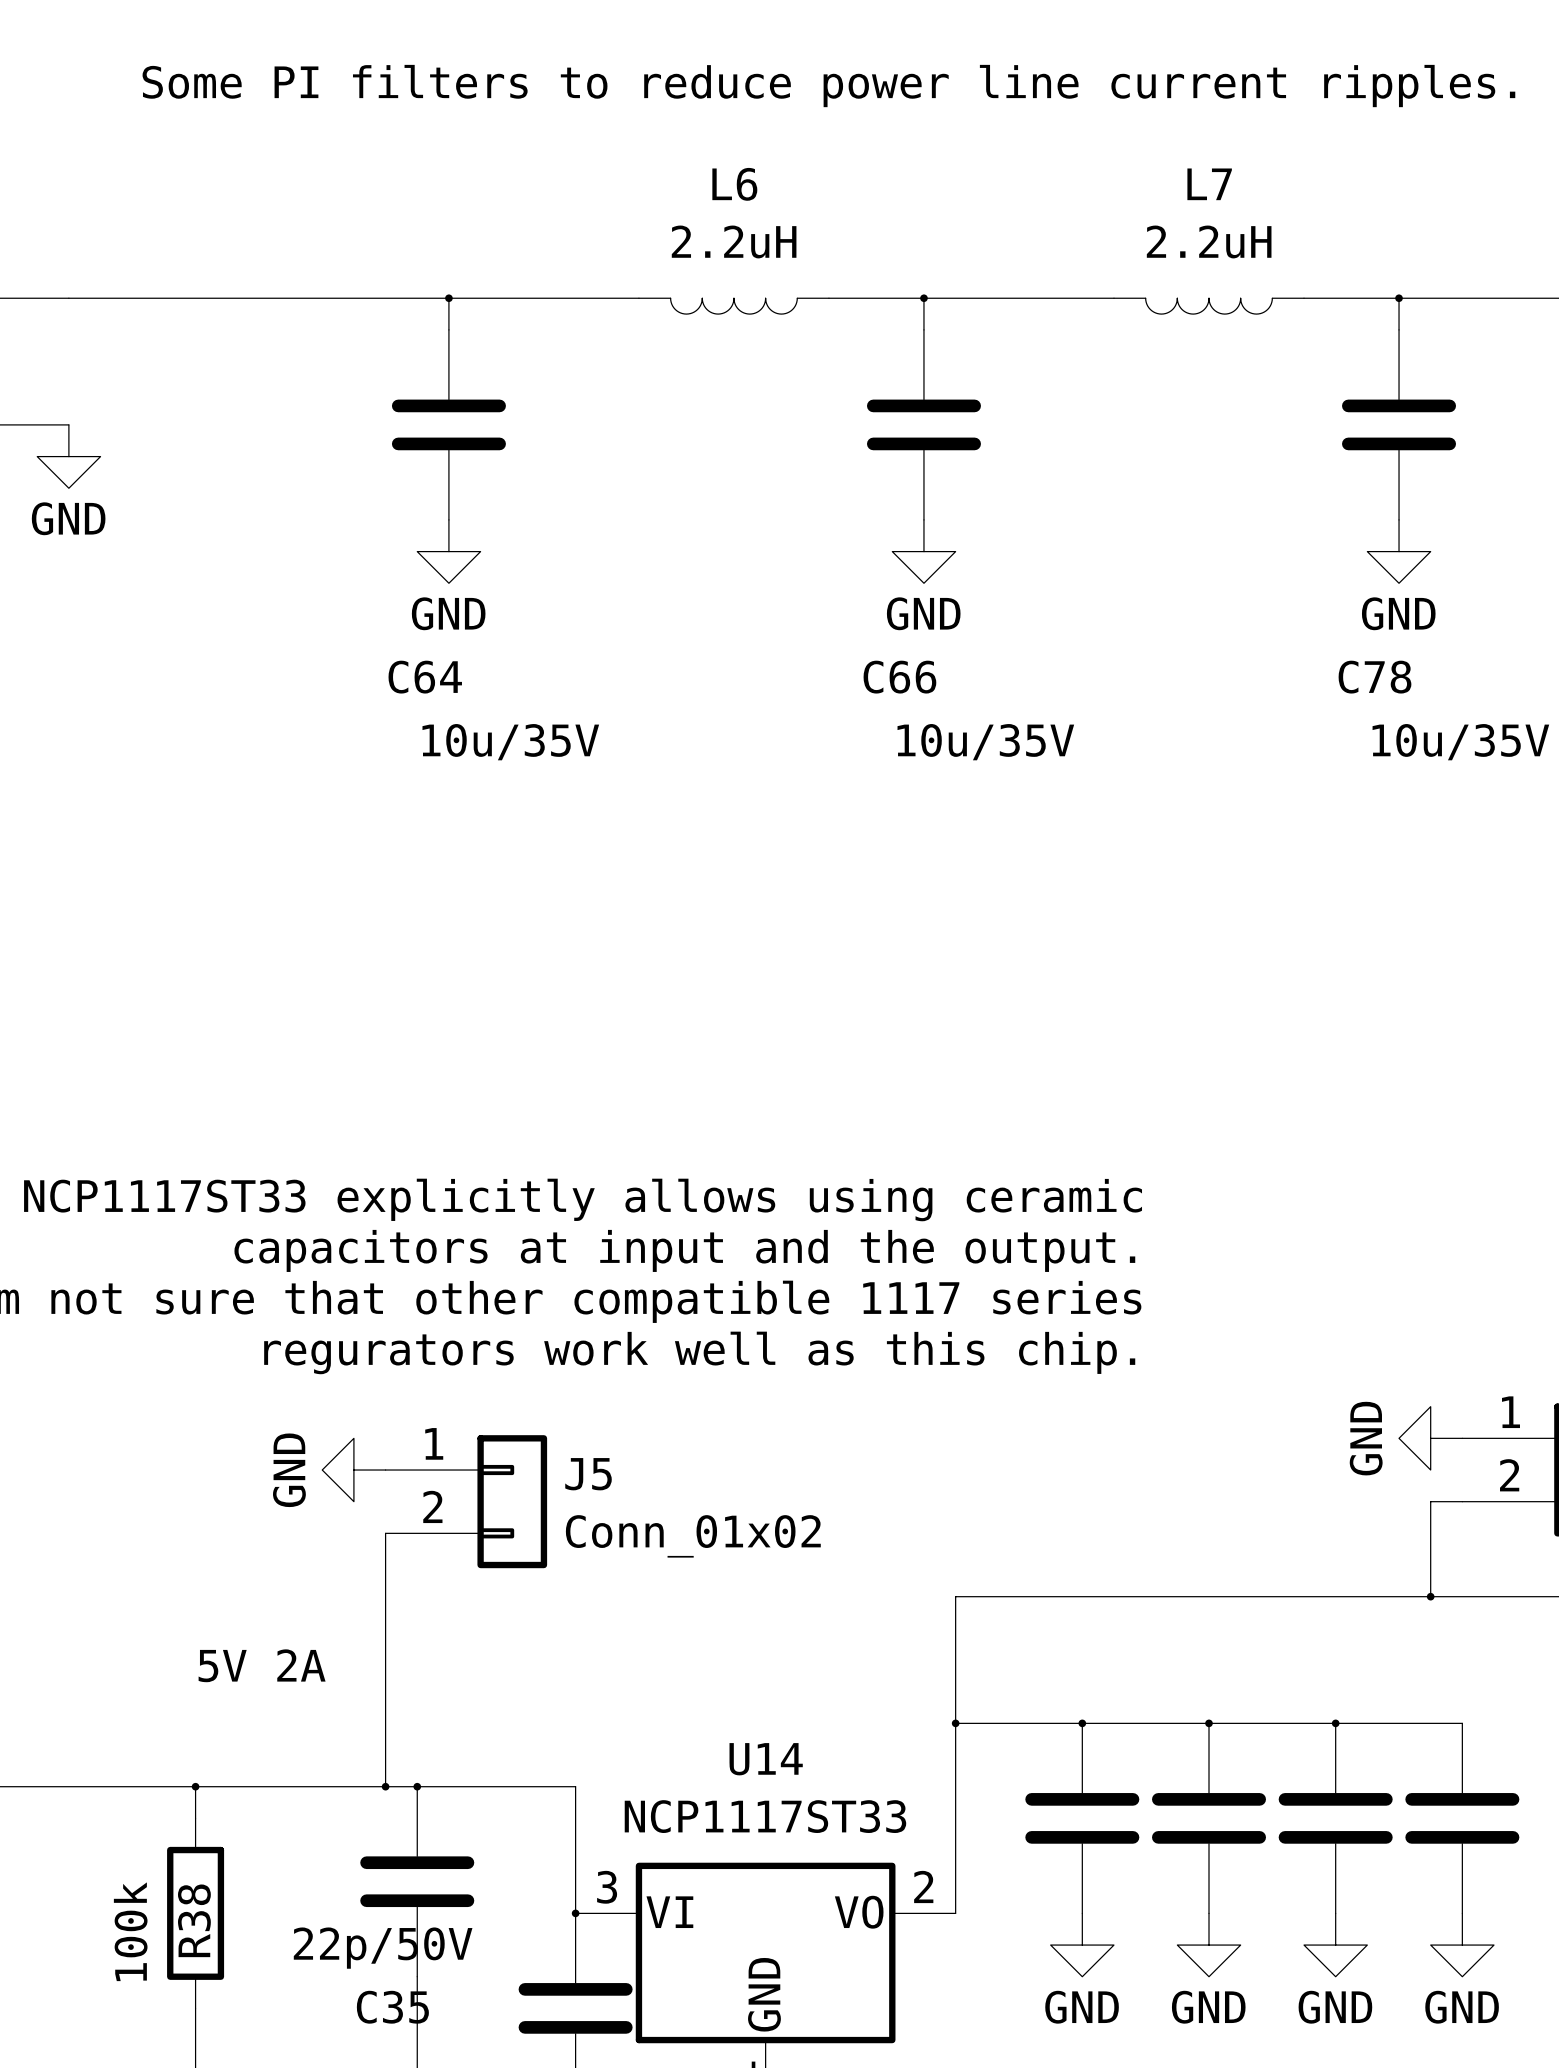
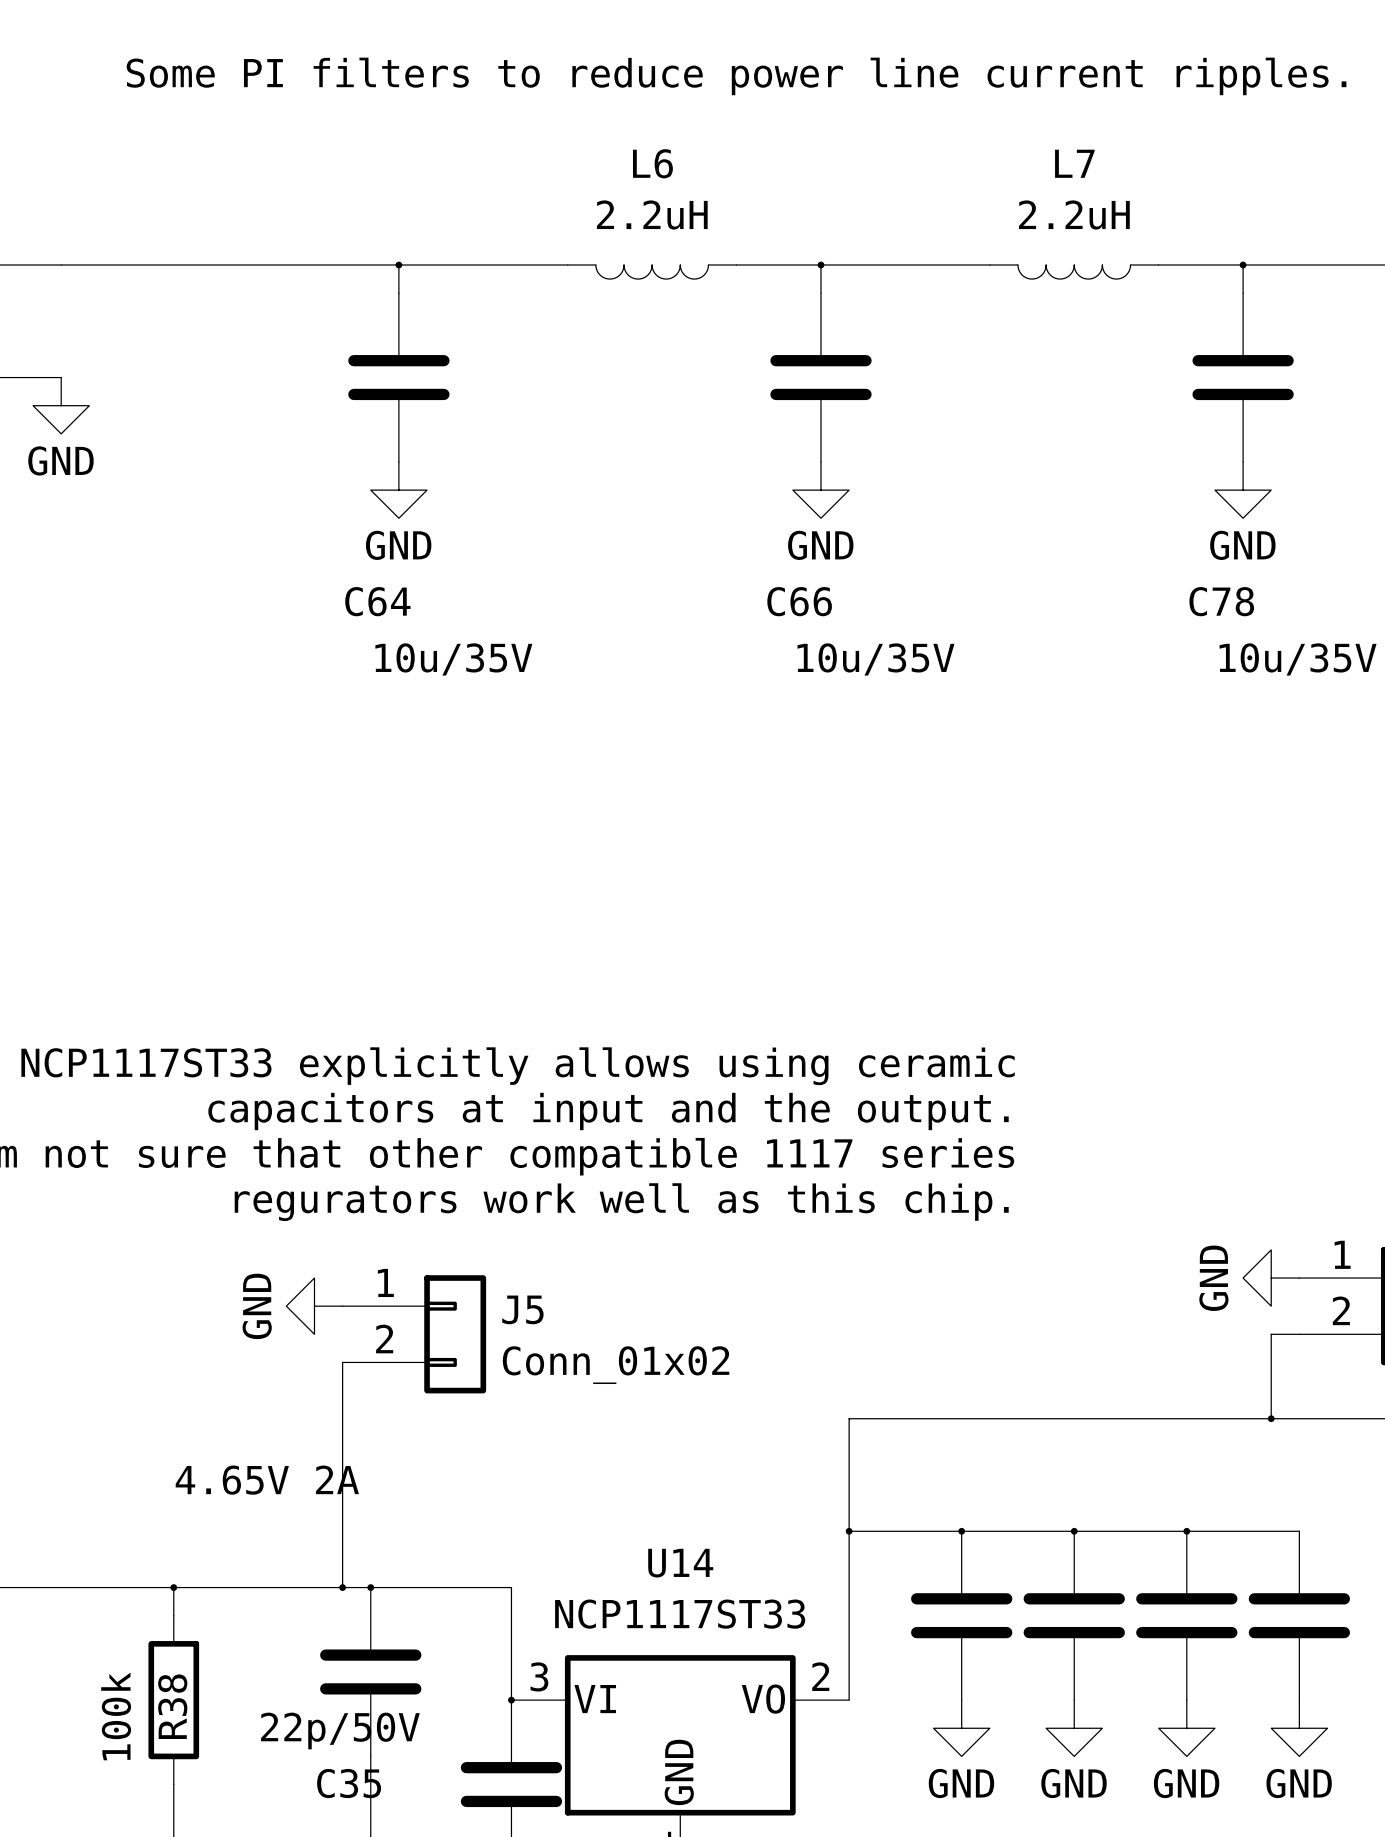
text: 5V 2A (262, 1665) -> 4.65V 2A (267, 1480)

